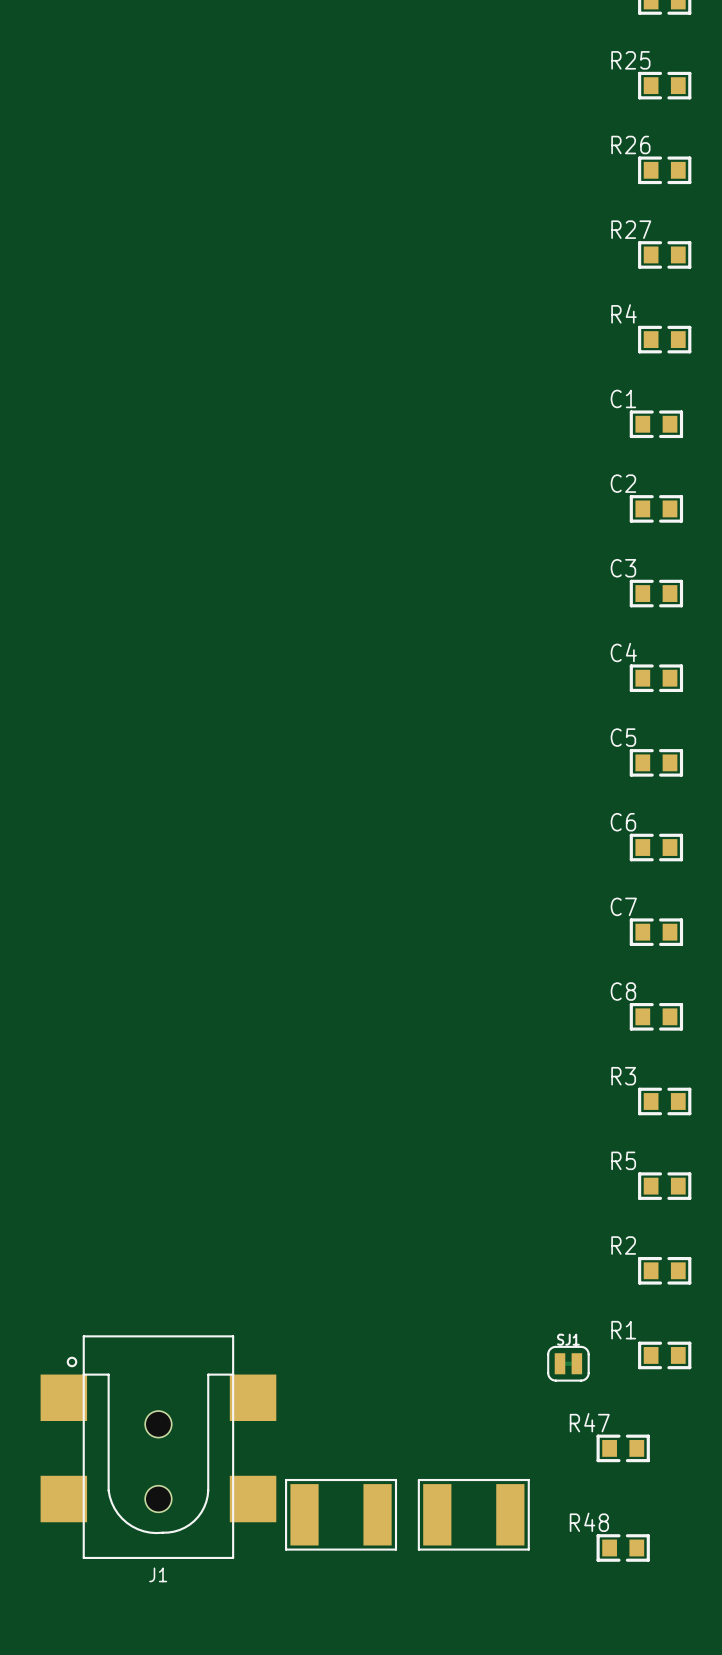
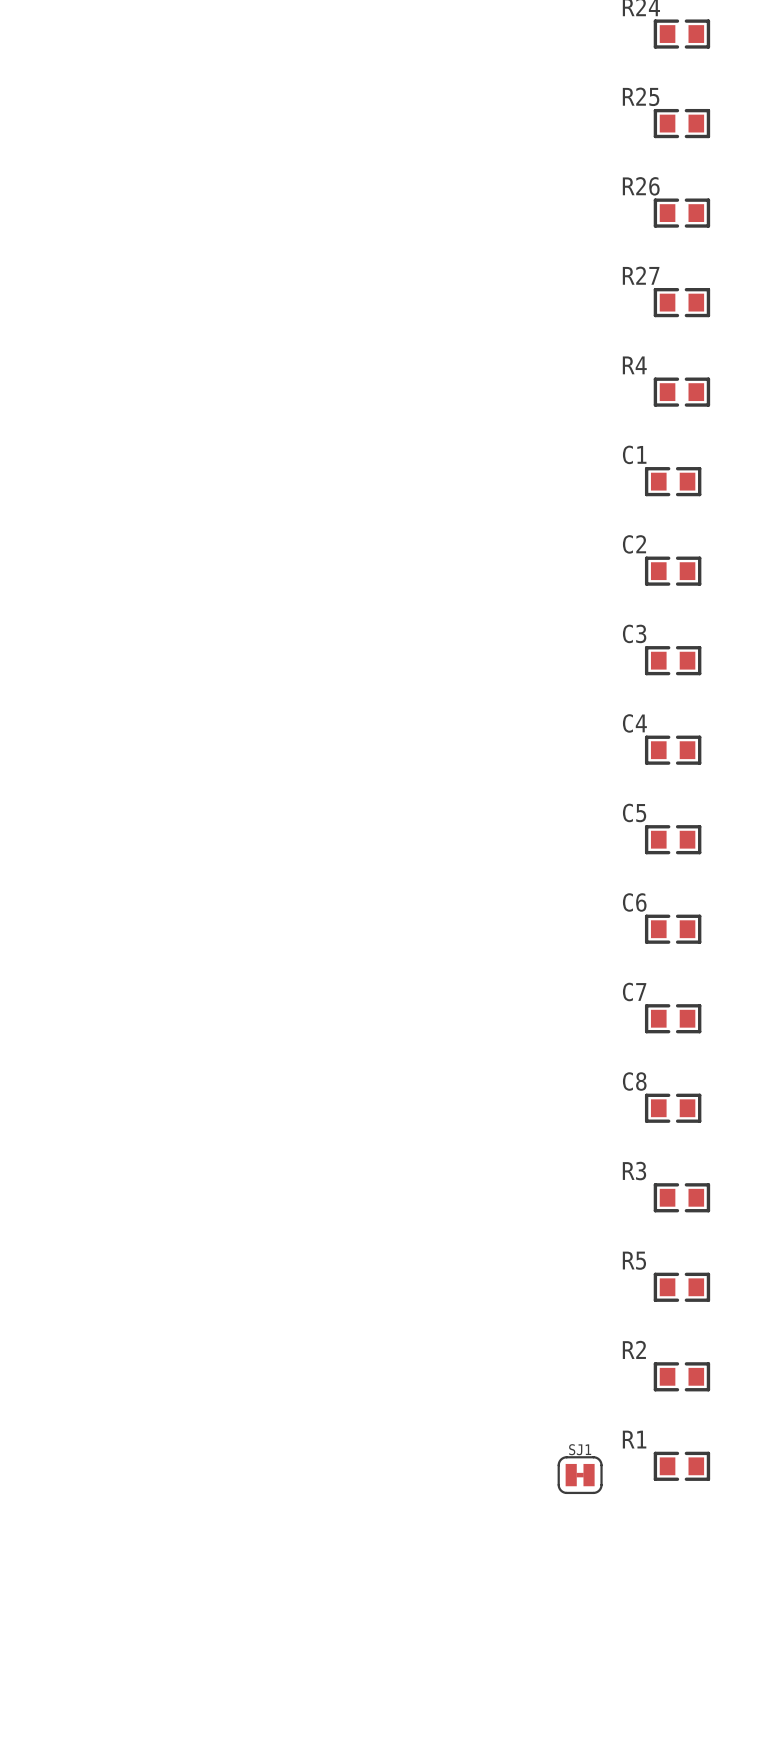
J1: (158, 1447) -> none
R47: (623, 1448) -> none
part: (341, 1514) -> none
part: (473, 1514) -> none
R48: (623, 1547) -> none

